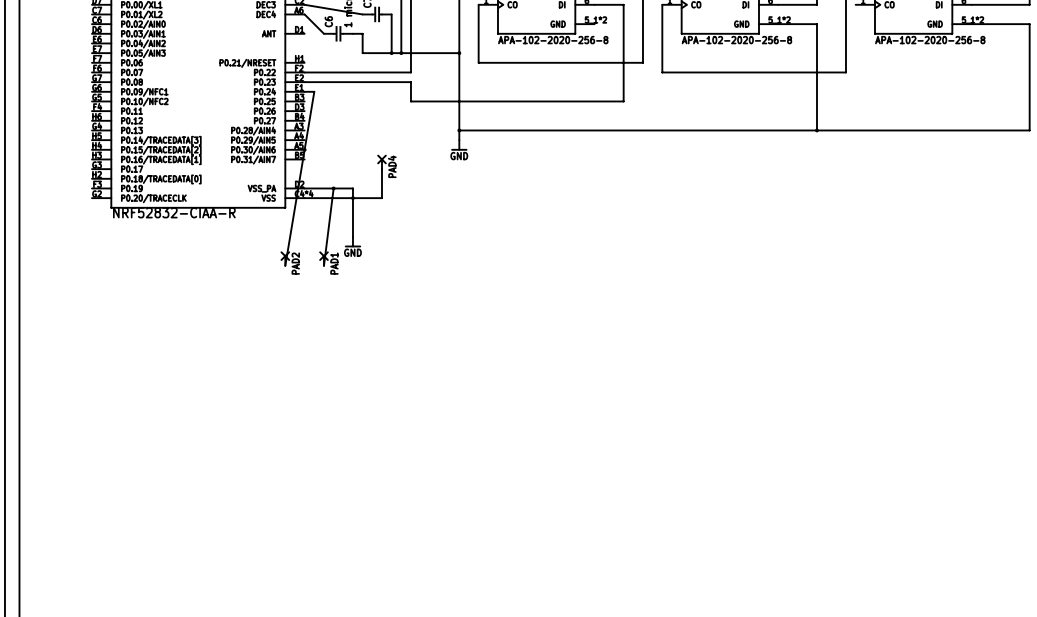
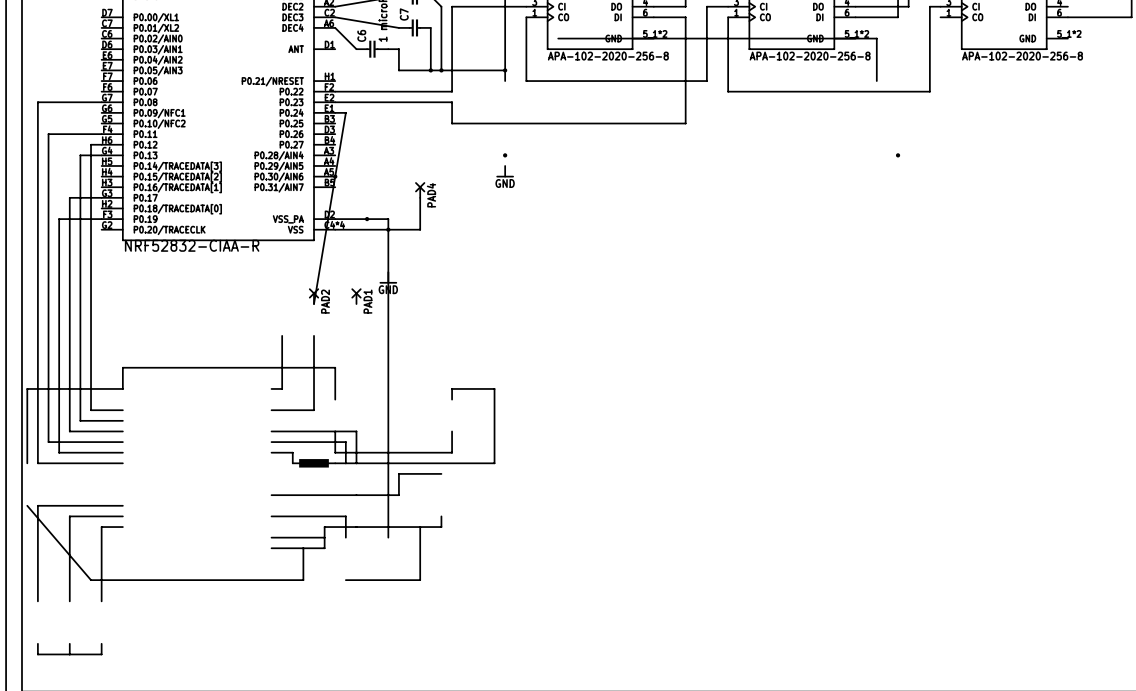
wire: none -> (558, 38) (855, 38)
wire: (797, 24) (816, 24) (816, 130) -> (876, 38) (876, 81)
wire: (971, 24) (1029, 24) (1029, 130) (459, 130) -> none
wire: (459, 62) (459, 140) -> none
wire: none -> (101, 102) (37, 102) (37, 463) (122, 463)
wire: none -> (101, 134) (48, 134) (48, 442) (122, 442)
wire: none -> (101, 144) (91, 144) (91, 410) (122, 410)
wire: none -> (101, 155) (80, 155) (80, 420) (122, 420)
wire: none -> (101, 197) (69, 197) (69, 431) (122, 431)
wire: none -> (101, 219) (59, 219) (59, 452) (122, 452)
wire: (333, 188) (323, 265) -> none
wire: none -> (388, 272) (388, 537)
wire: none -> (282, 335) (282, 388) (271, 388)
wire: none -> (314, 335) (314, 410) (271, 410)
wire: none -> (335, 399) (335, 367) (122, 367) (122, 388) (27, 388) (27, 463)
wire: none -> (452, 399) (452, 388) (494, 388) (494, 463) (335, 463)
wire: none -> (271, 431) (356, 431) (356, 463)
wire: none -> (335, 431) (335, 452) (452, 452) (452, 431)
wire: none -> (271, 442) (345, 442) (345, 463)
wire: none -> (271, 452) (292, 452) (292, 463)
part: none -> (314, 463)
wire: none -> (441, 473) (398, 473) (398, 495) (271, 495)
wire: none -> (27, 505) (91, 580) (303, 580) (303, 548)
wire: none -> (122, 505) (37, 505) (37, 601)
wire: none -> (122, 516) (69, 516) (69, 601)
wire: none -> (271, 516) (345, 516) (345, 537)
wire: none -> (441, 516) (441, 527) (324, 527) (324, 548) (271, 548)
wire: none -> (122, 527) (101, 527) (101, 601)
wire: none -> (420, 527) (420, 580) (345, 580)
wire: none -> (271, 537) (324, 537)
wire: none -> (37, 643) (37, 654) (101, 654) (101, 643)
wire: none -> (69, 643) (69, 654)

